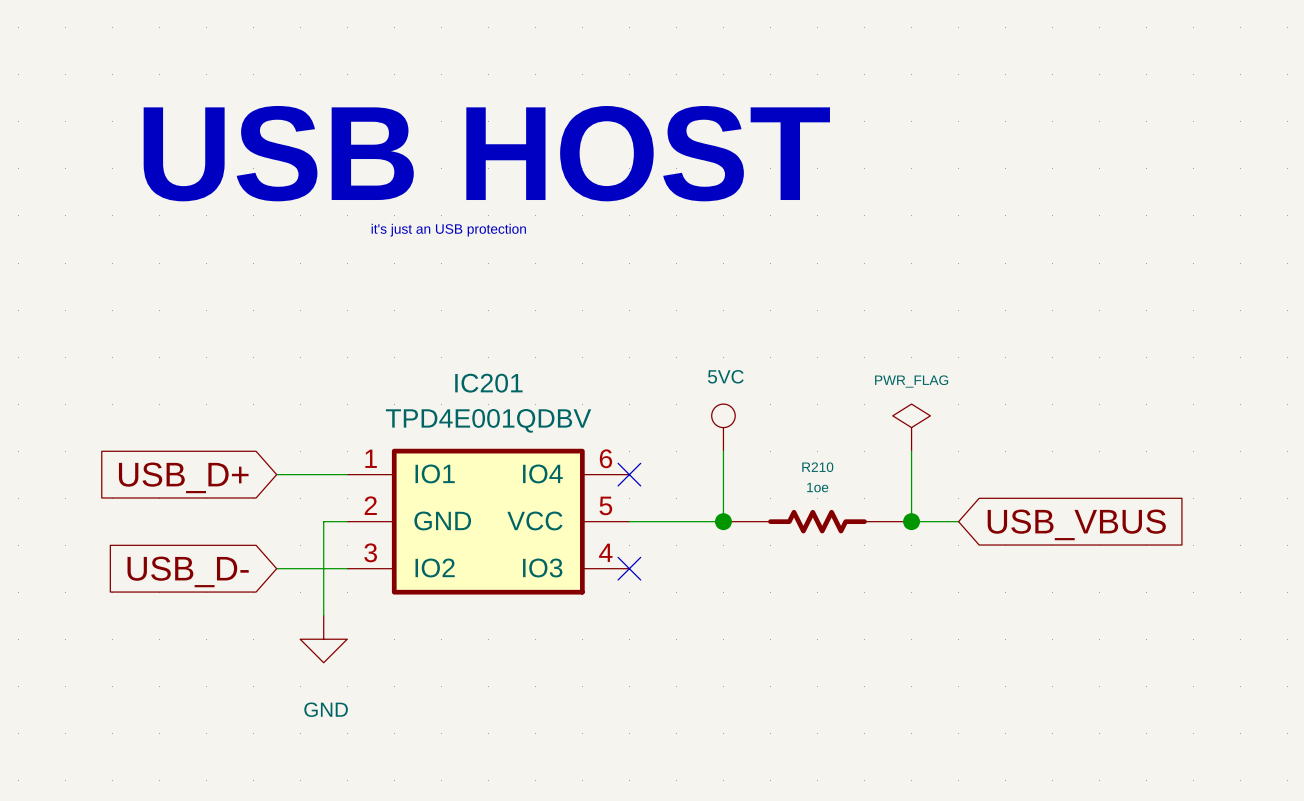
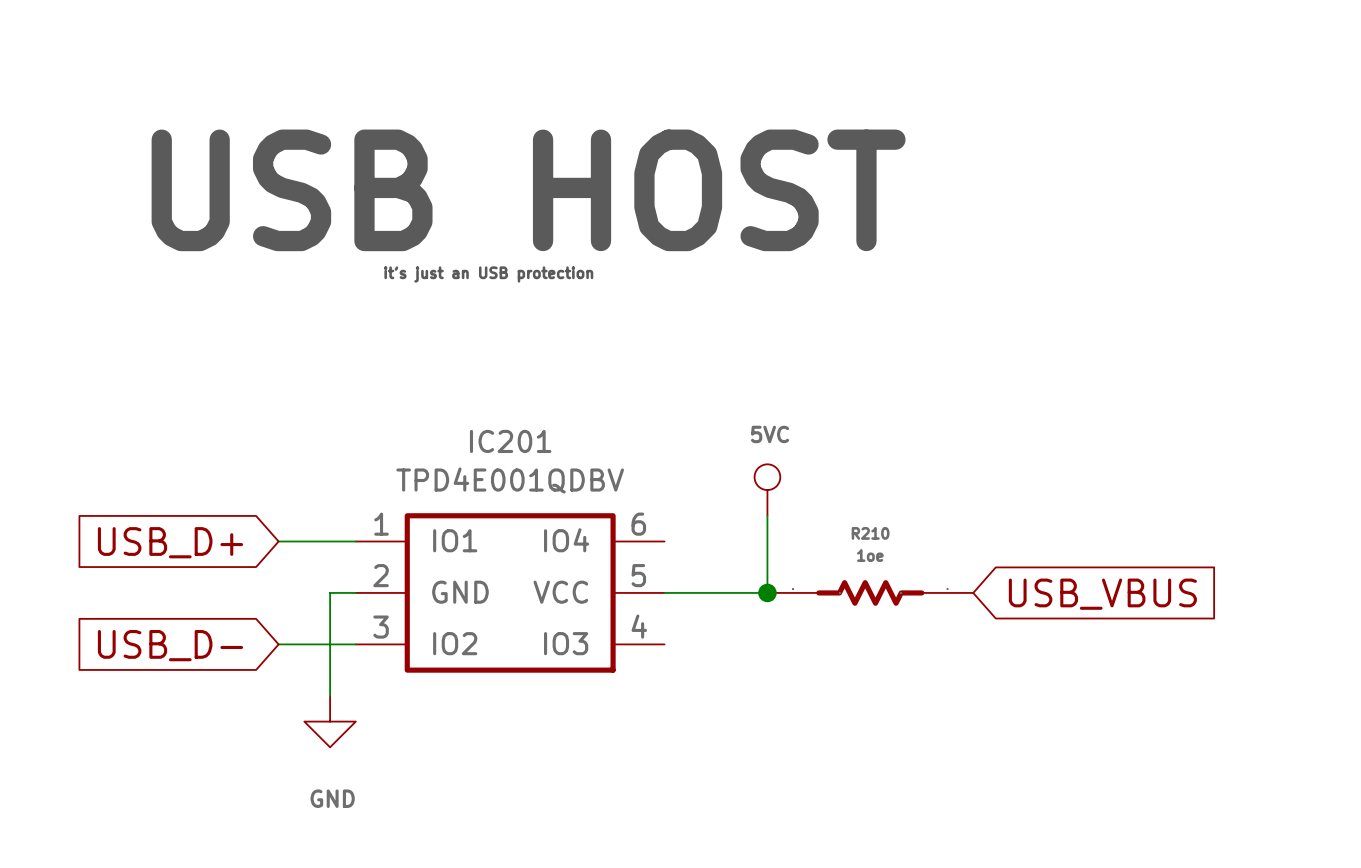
power symbol: PWR_FLAG (911, 427) -> none
wire: (911, 451) (911, 521) (958, 521) -> none
no-connect mark: (629, 474) -> none
junction: (911, 521) -> none
global label position: USB_VBUS (1076, 524) -> USB_VBUS (1102, 594)
no-connect mark: (629, 568) -> none

